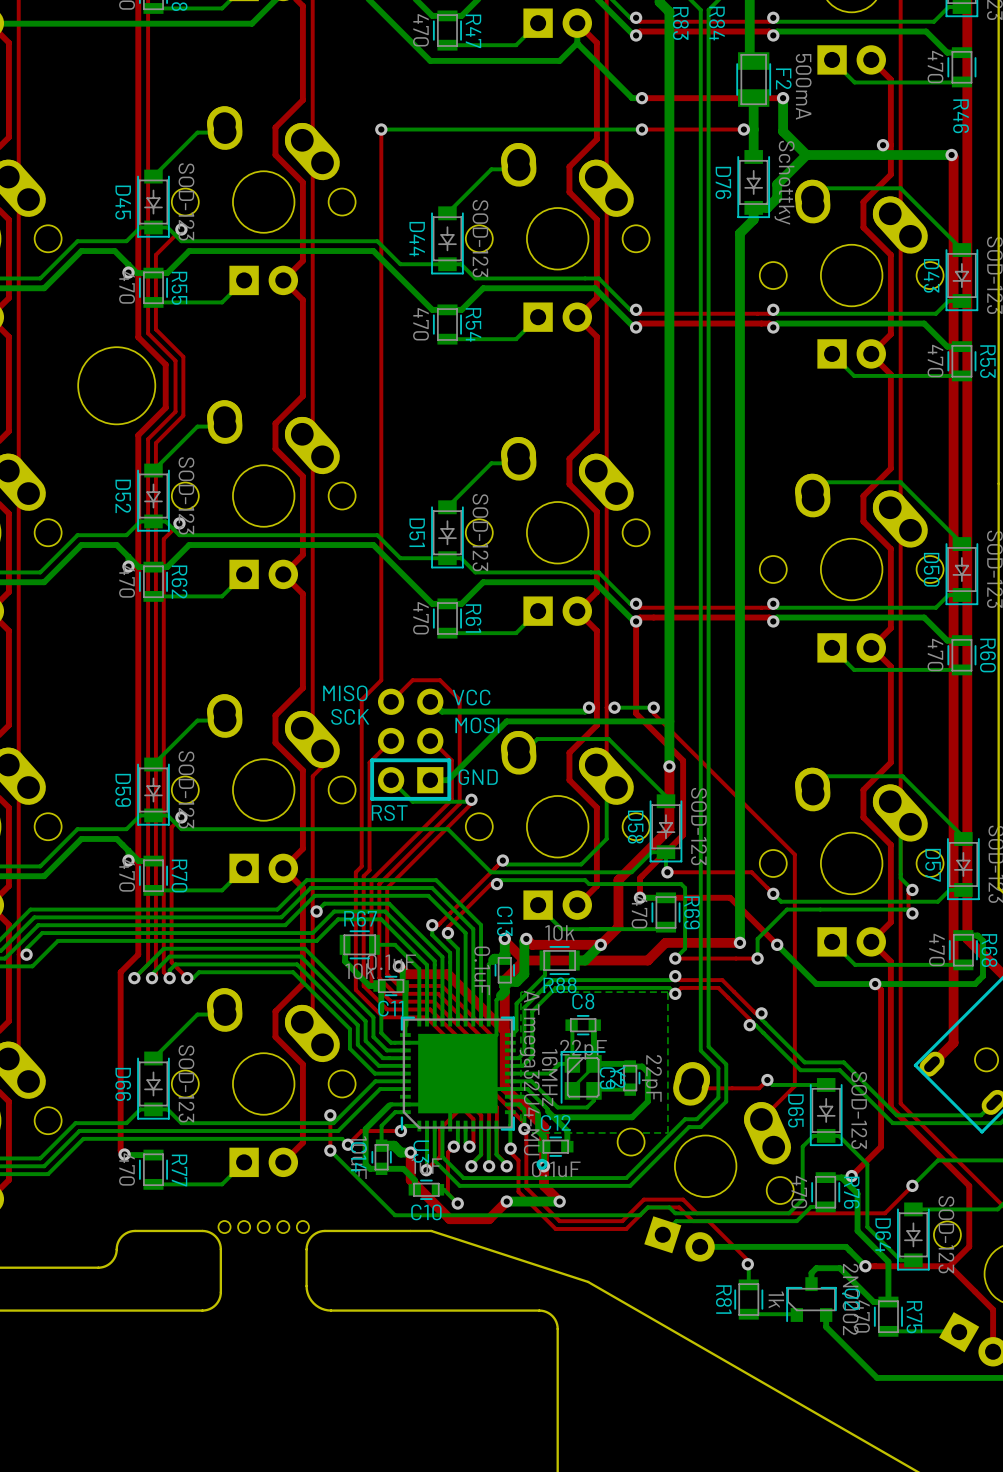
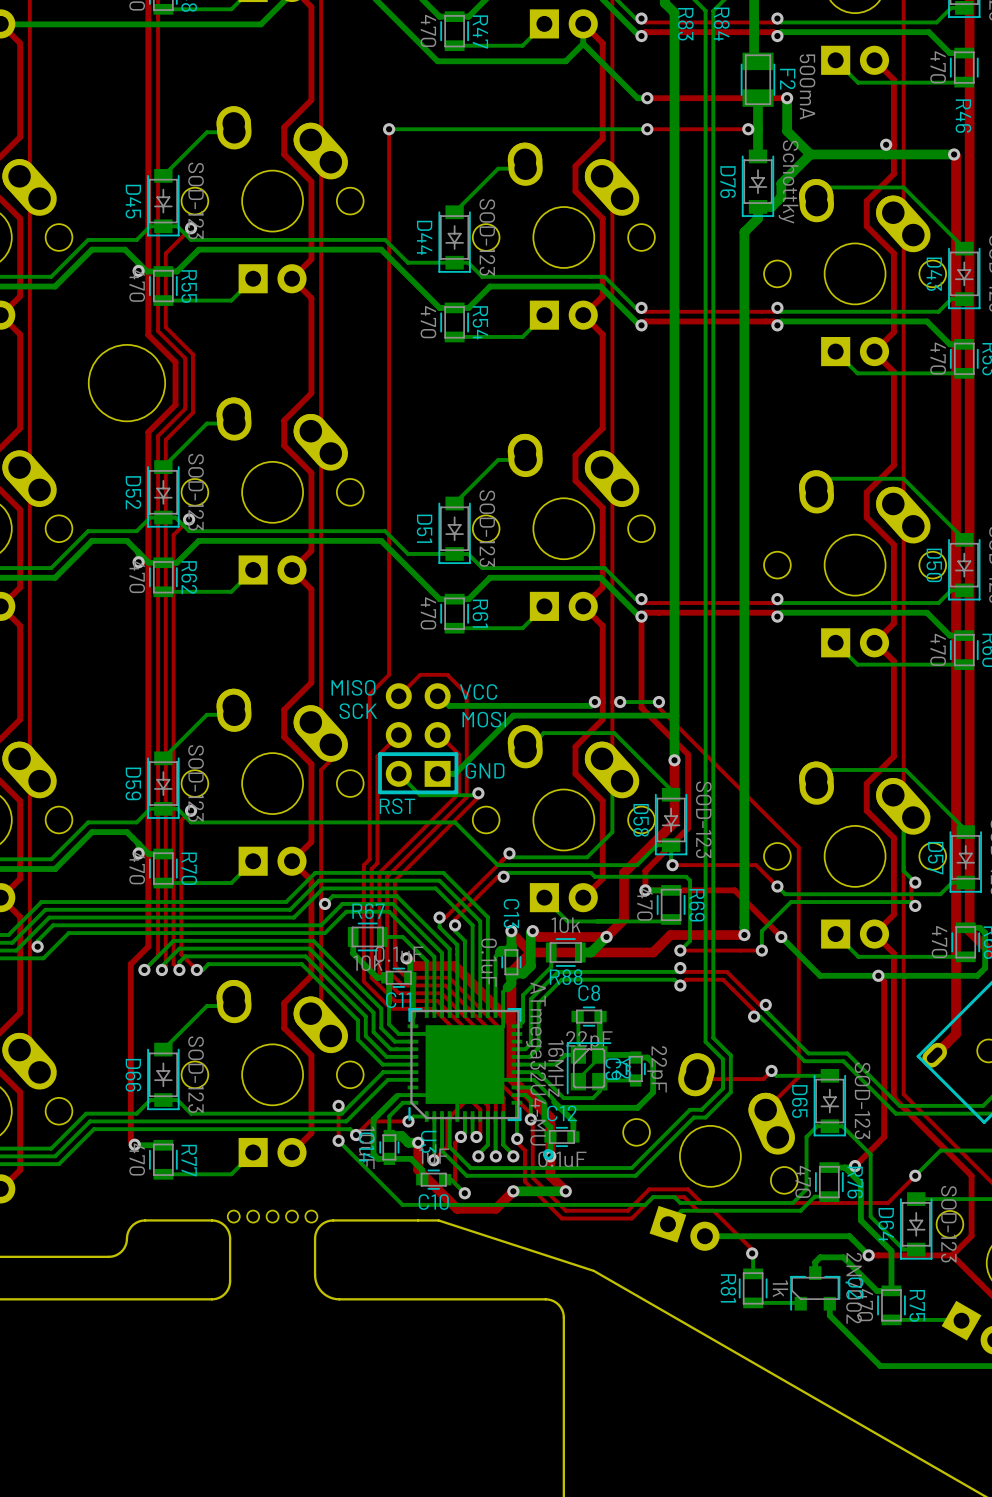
bottom zone outline: (667, 992) (667, 1132) (520, 1132) (520, 992) (667, 992) -> none

